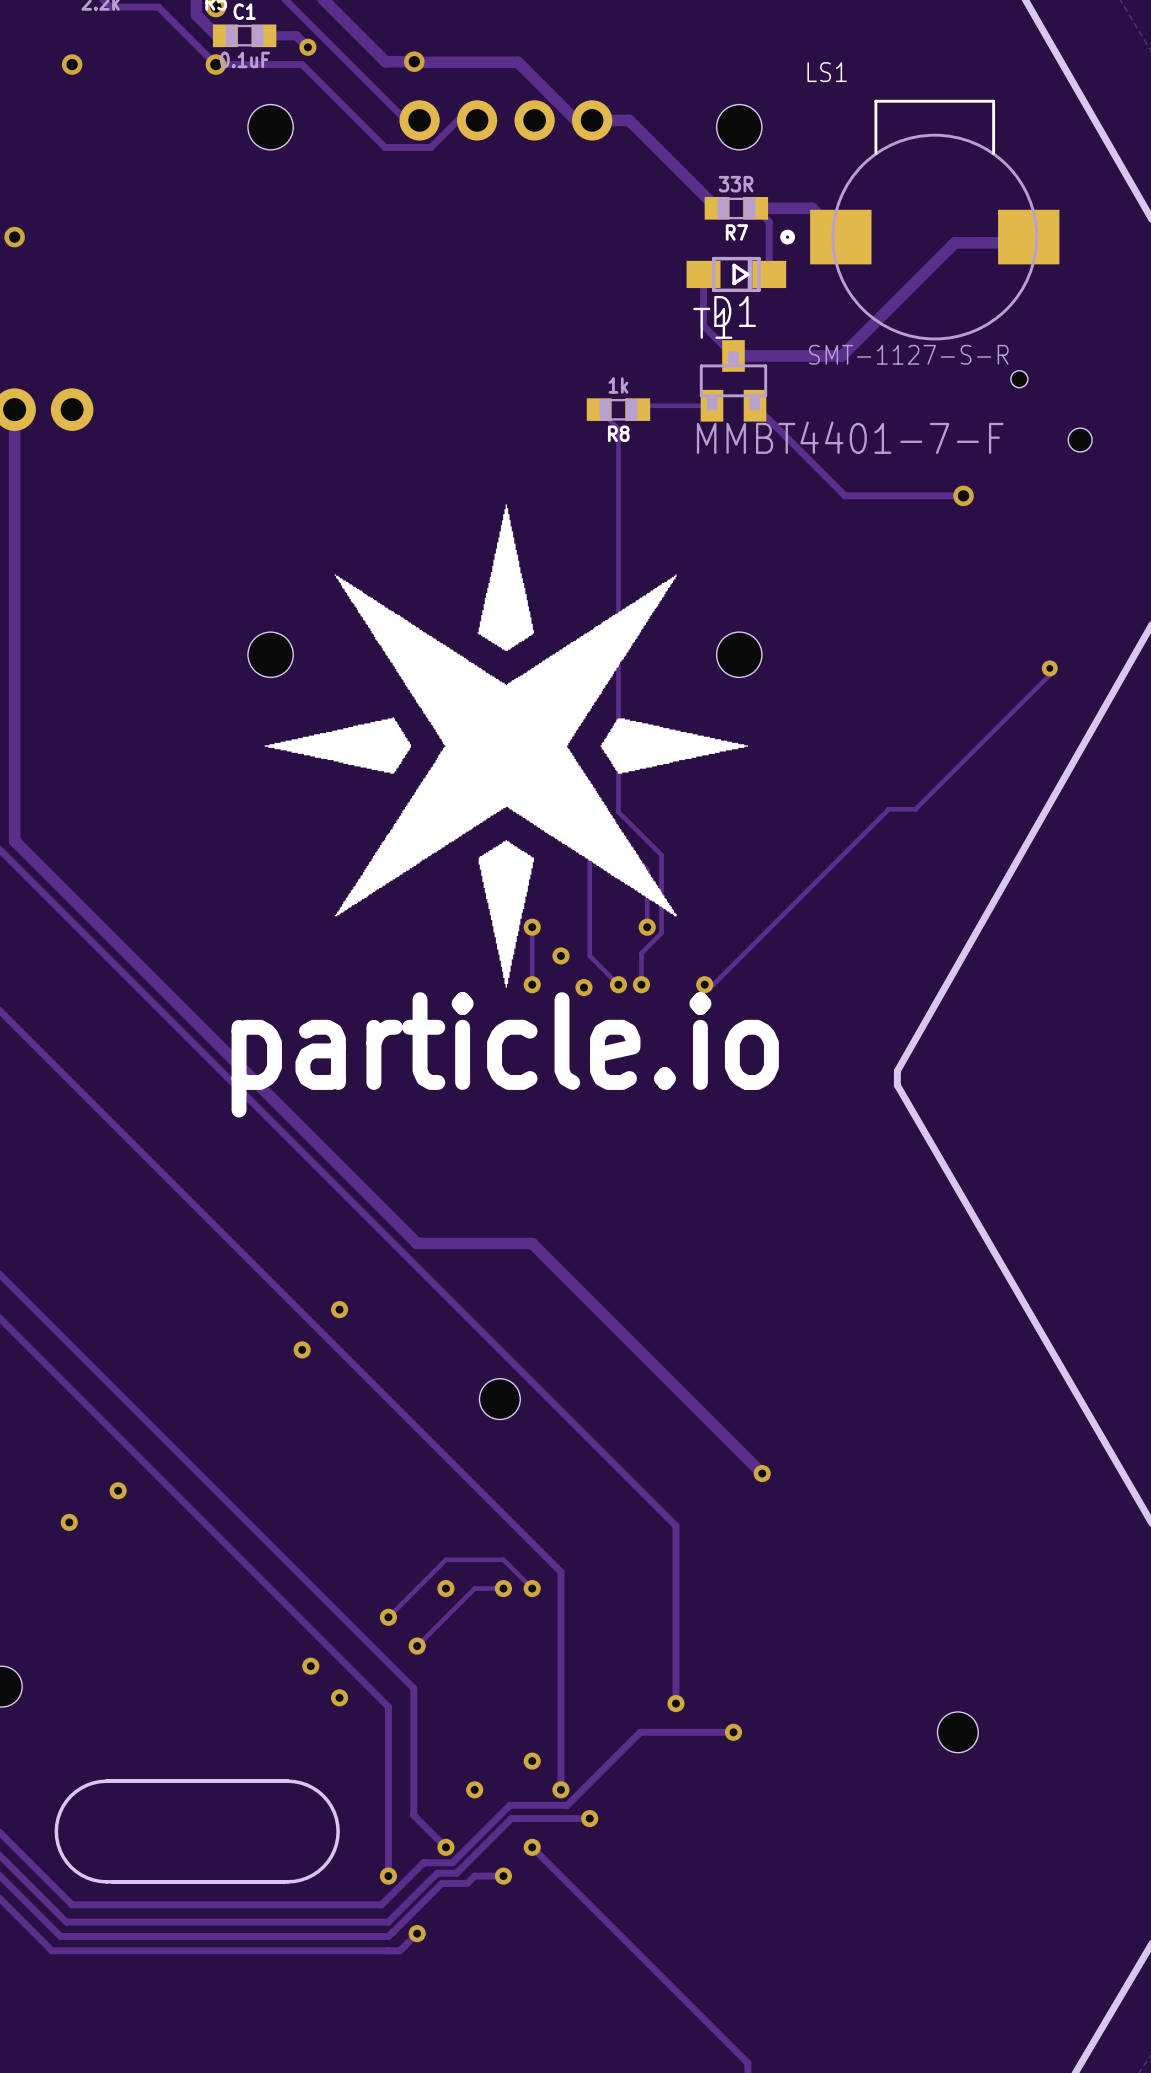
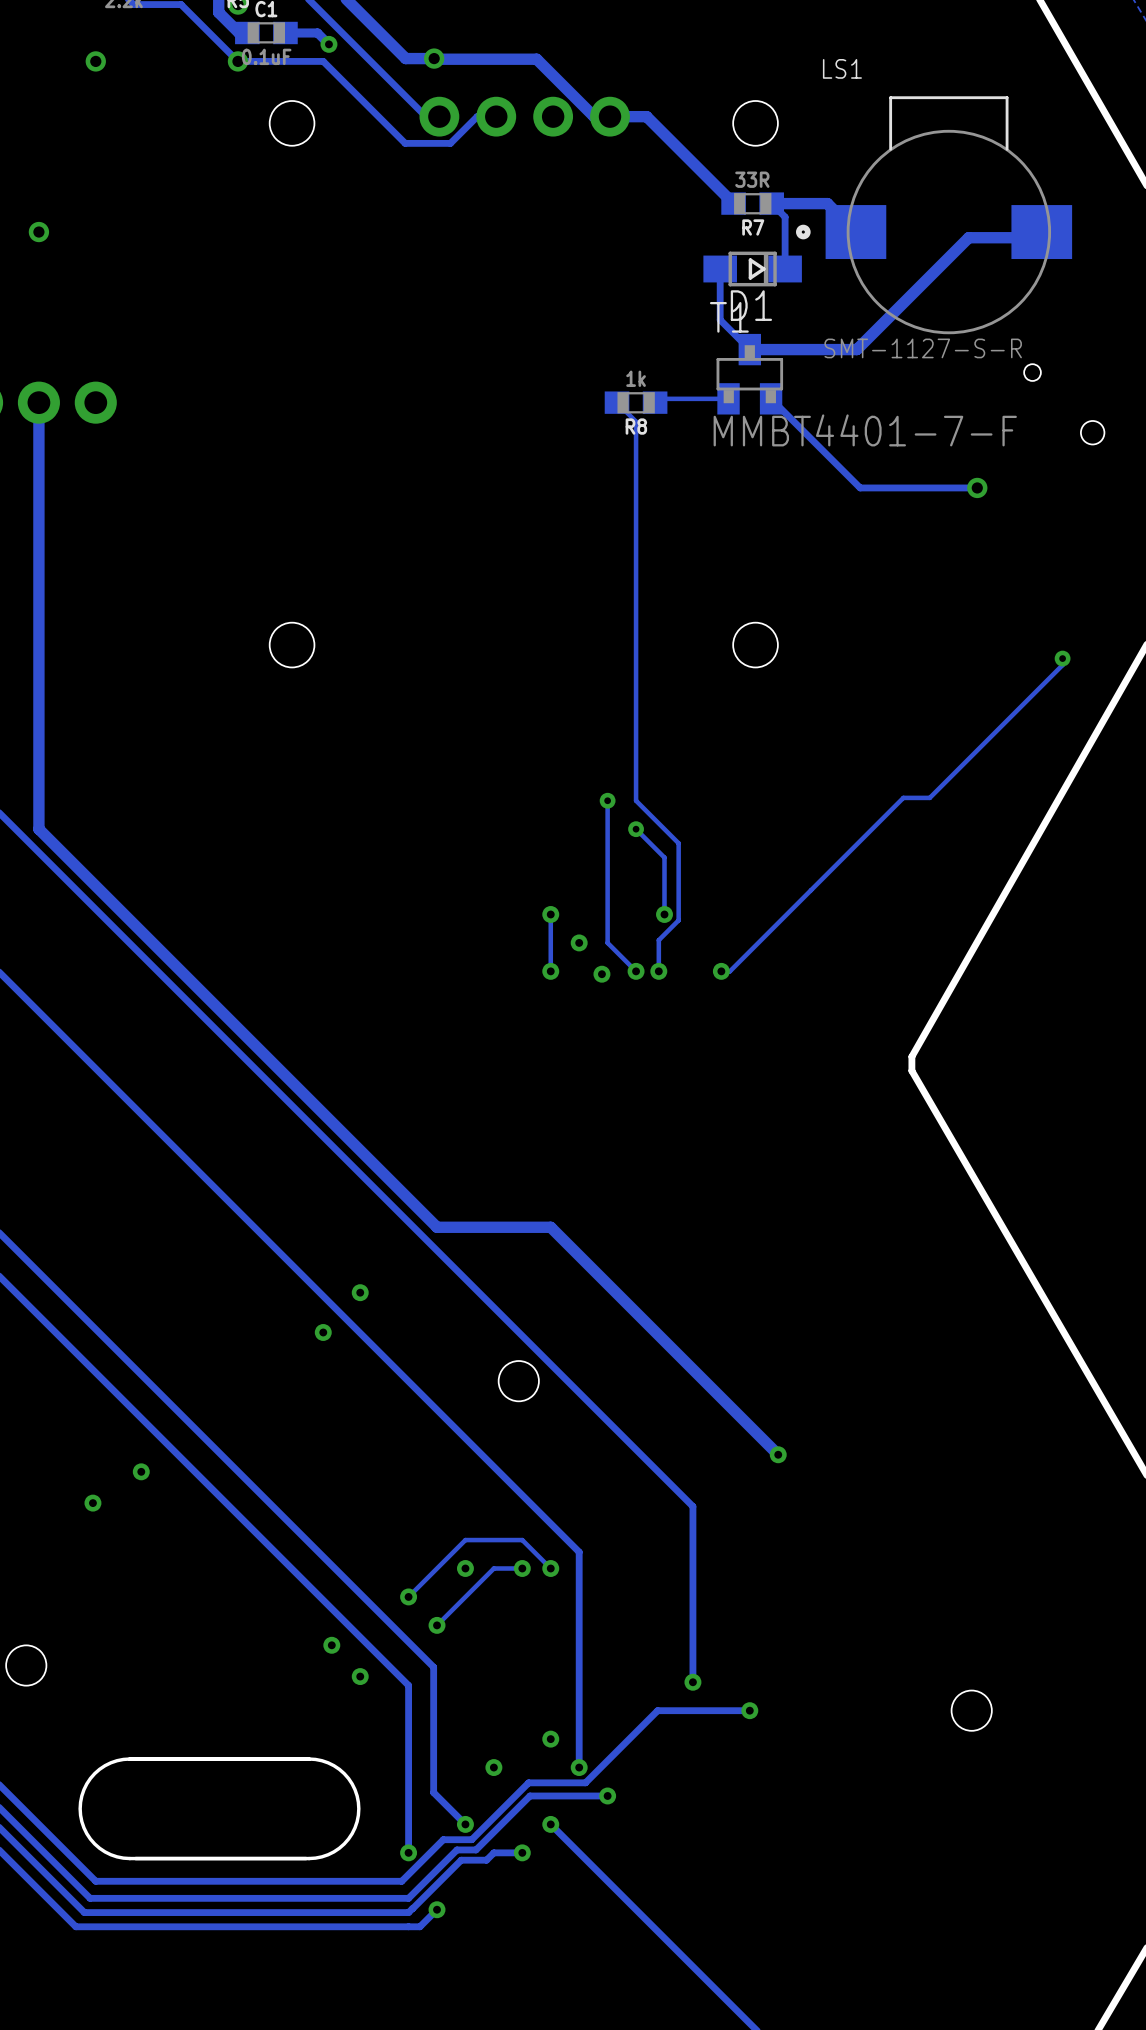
drawing: [264, 504, 748, 988] -> none
text: particle.io (505, 1054) -> none

